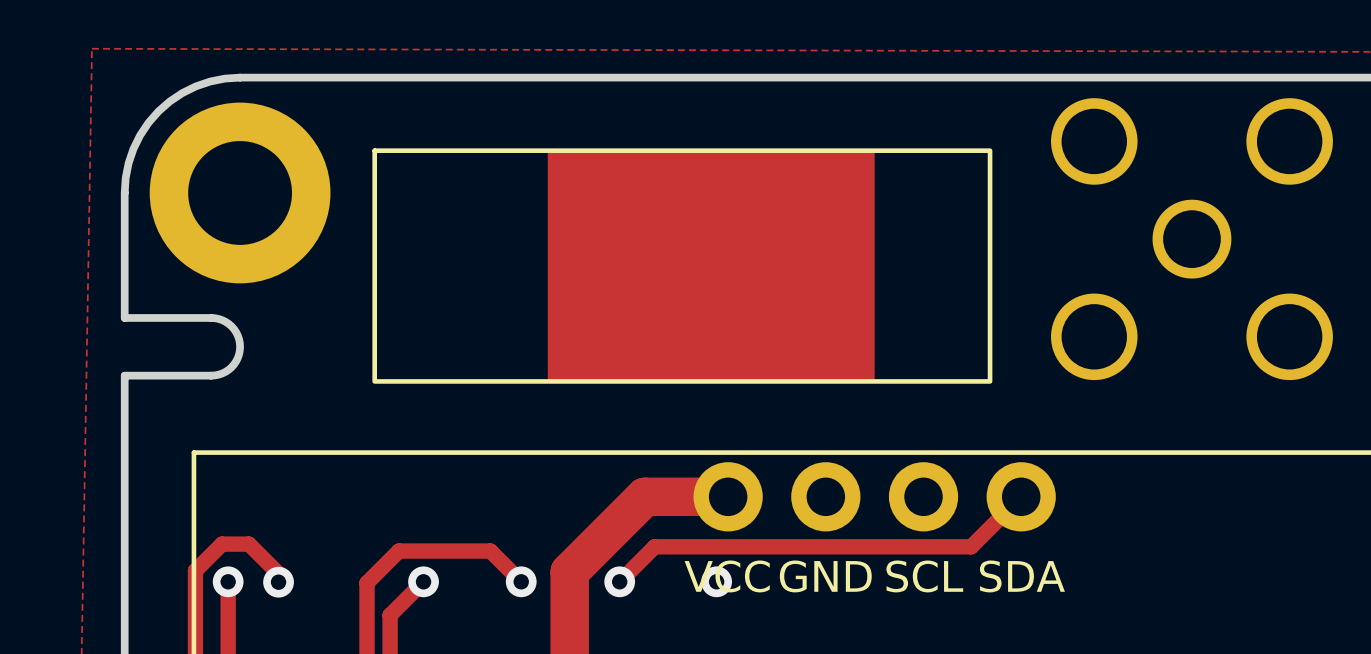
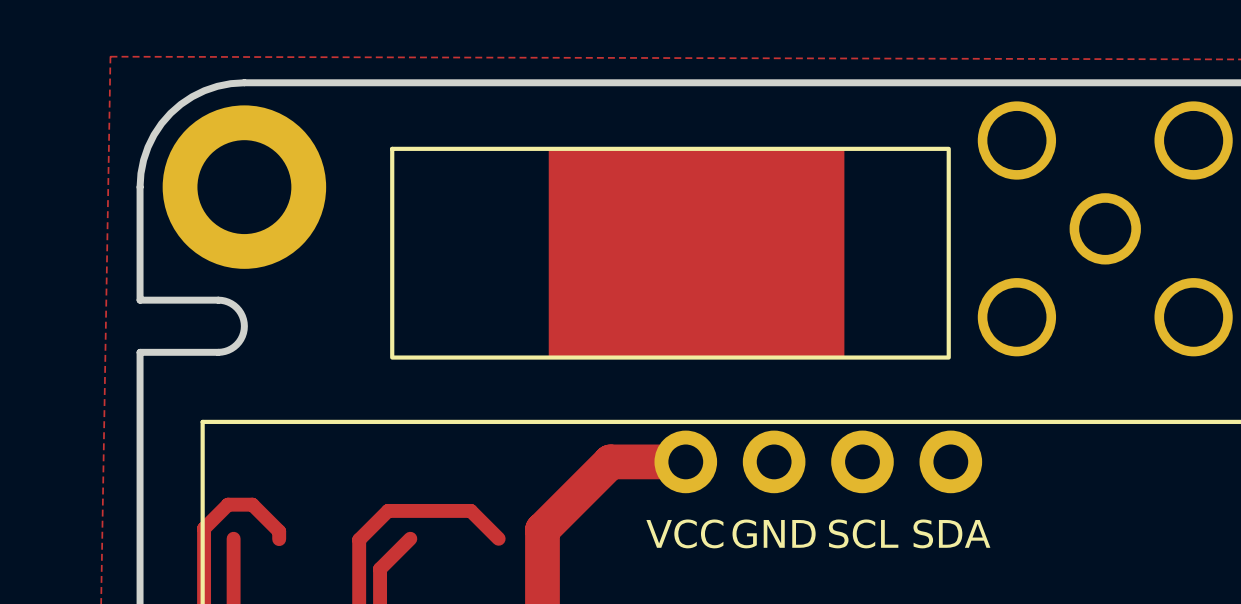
part position: (682, 266) -> (670, 253)
track: (1021, 496) (971, 546) (654, 546) (619, 581) -> none
via: (228, 581) -> none
via: (423, 581) -> none
via: (521, 581) -> none
via: (619, 581) -> none
via: (716, 581) -> none
via: (278, 582) -> none

